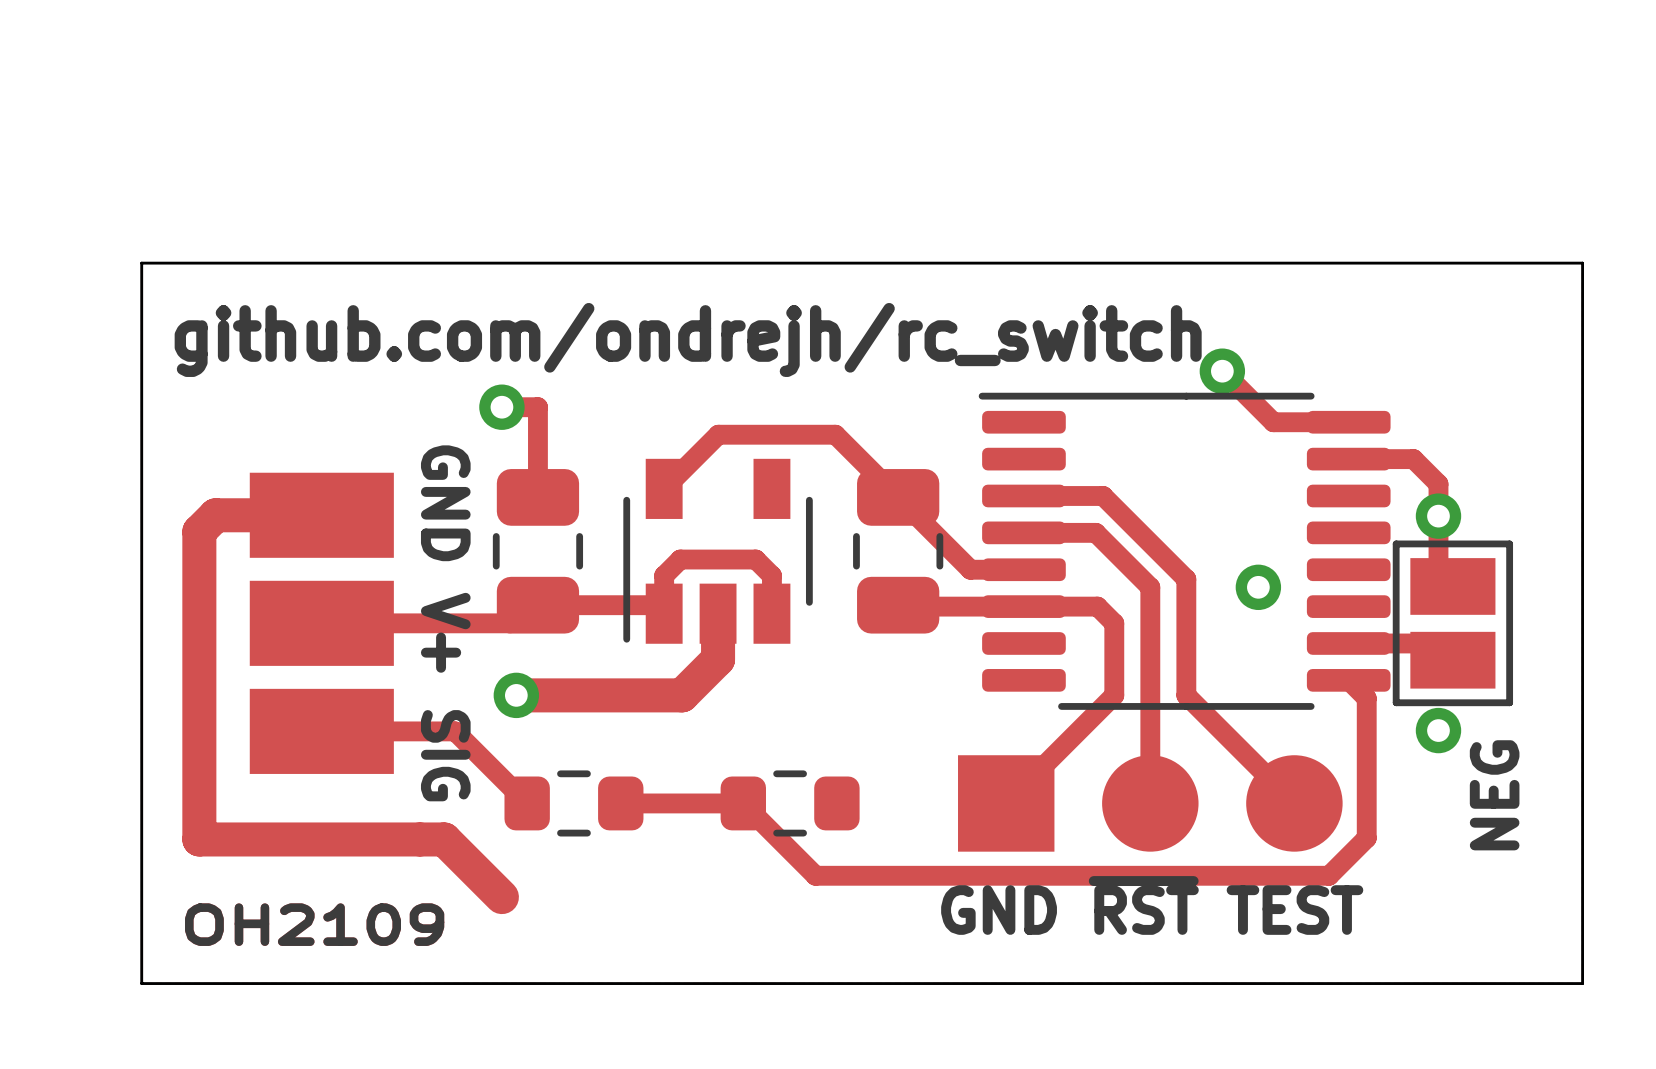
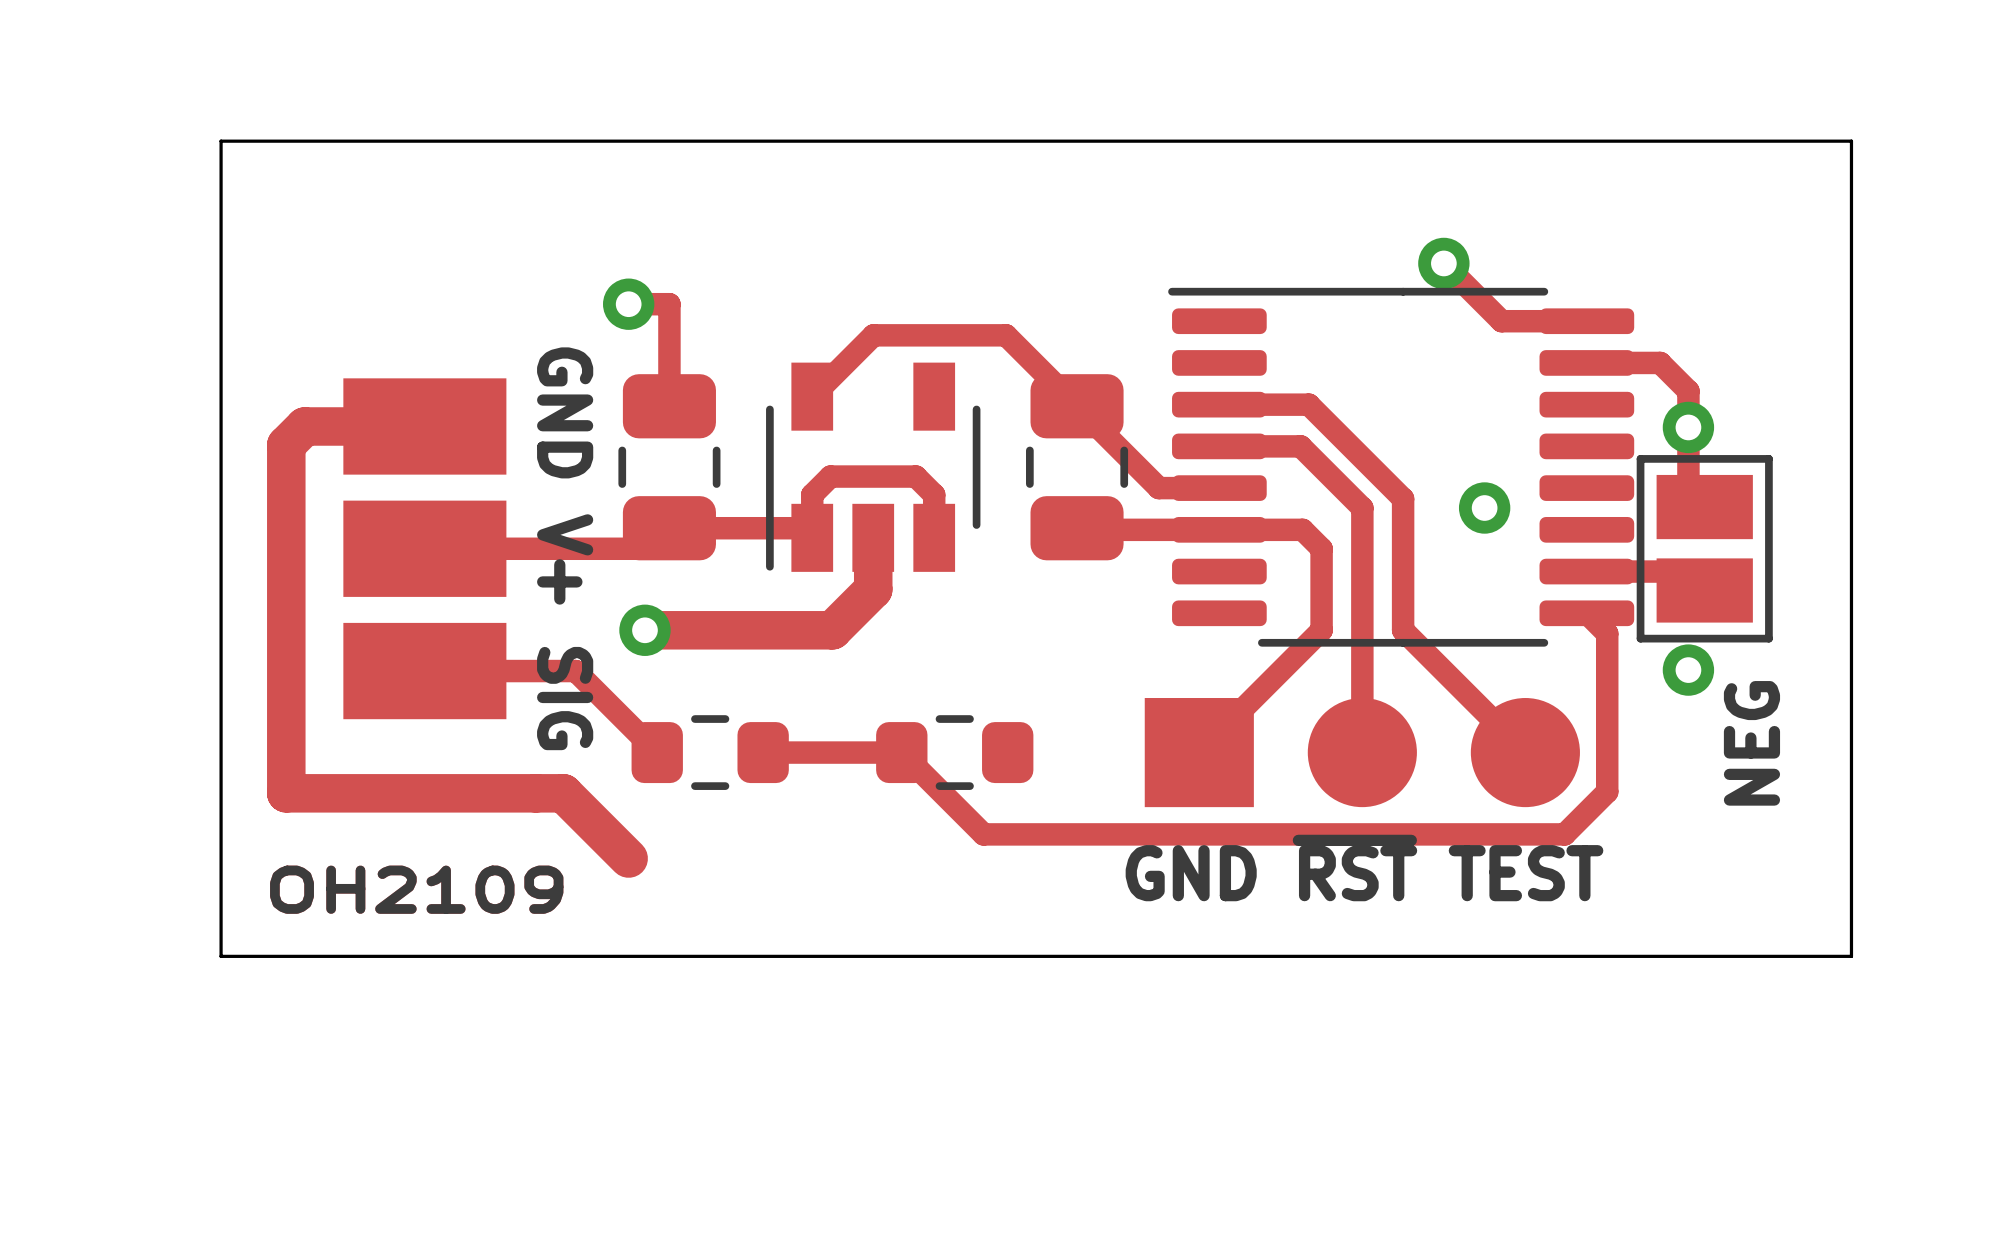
text: github.com/ondrejh/rc_switch (688, 339) -> none

